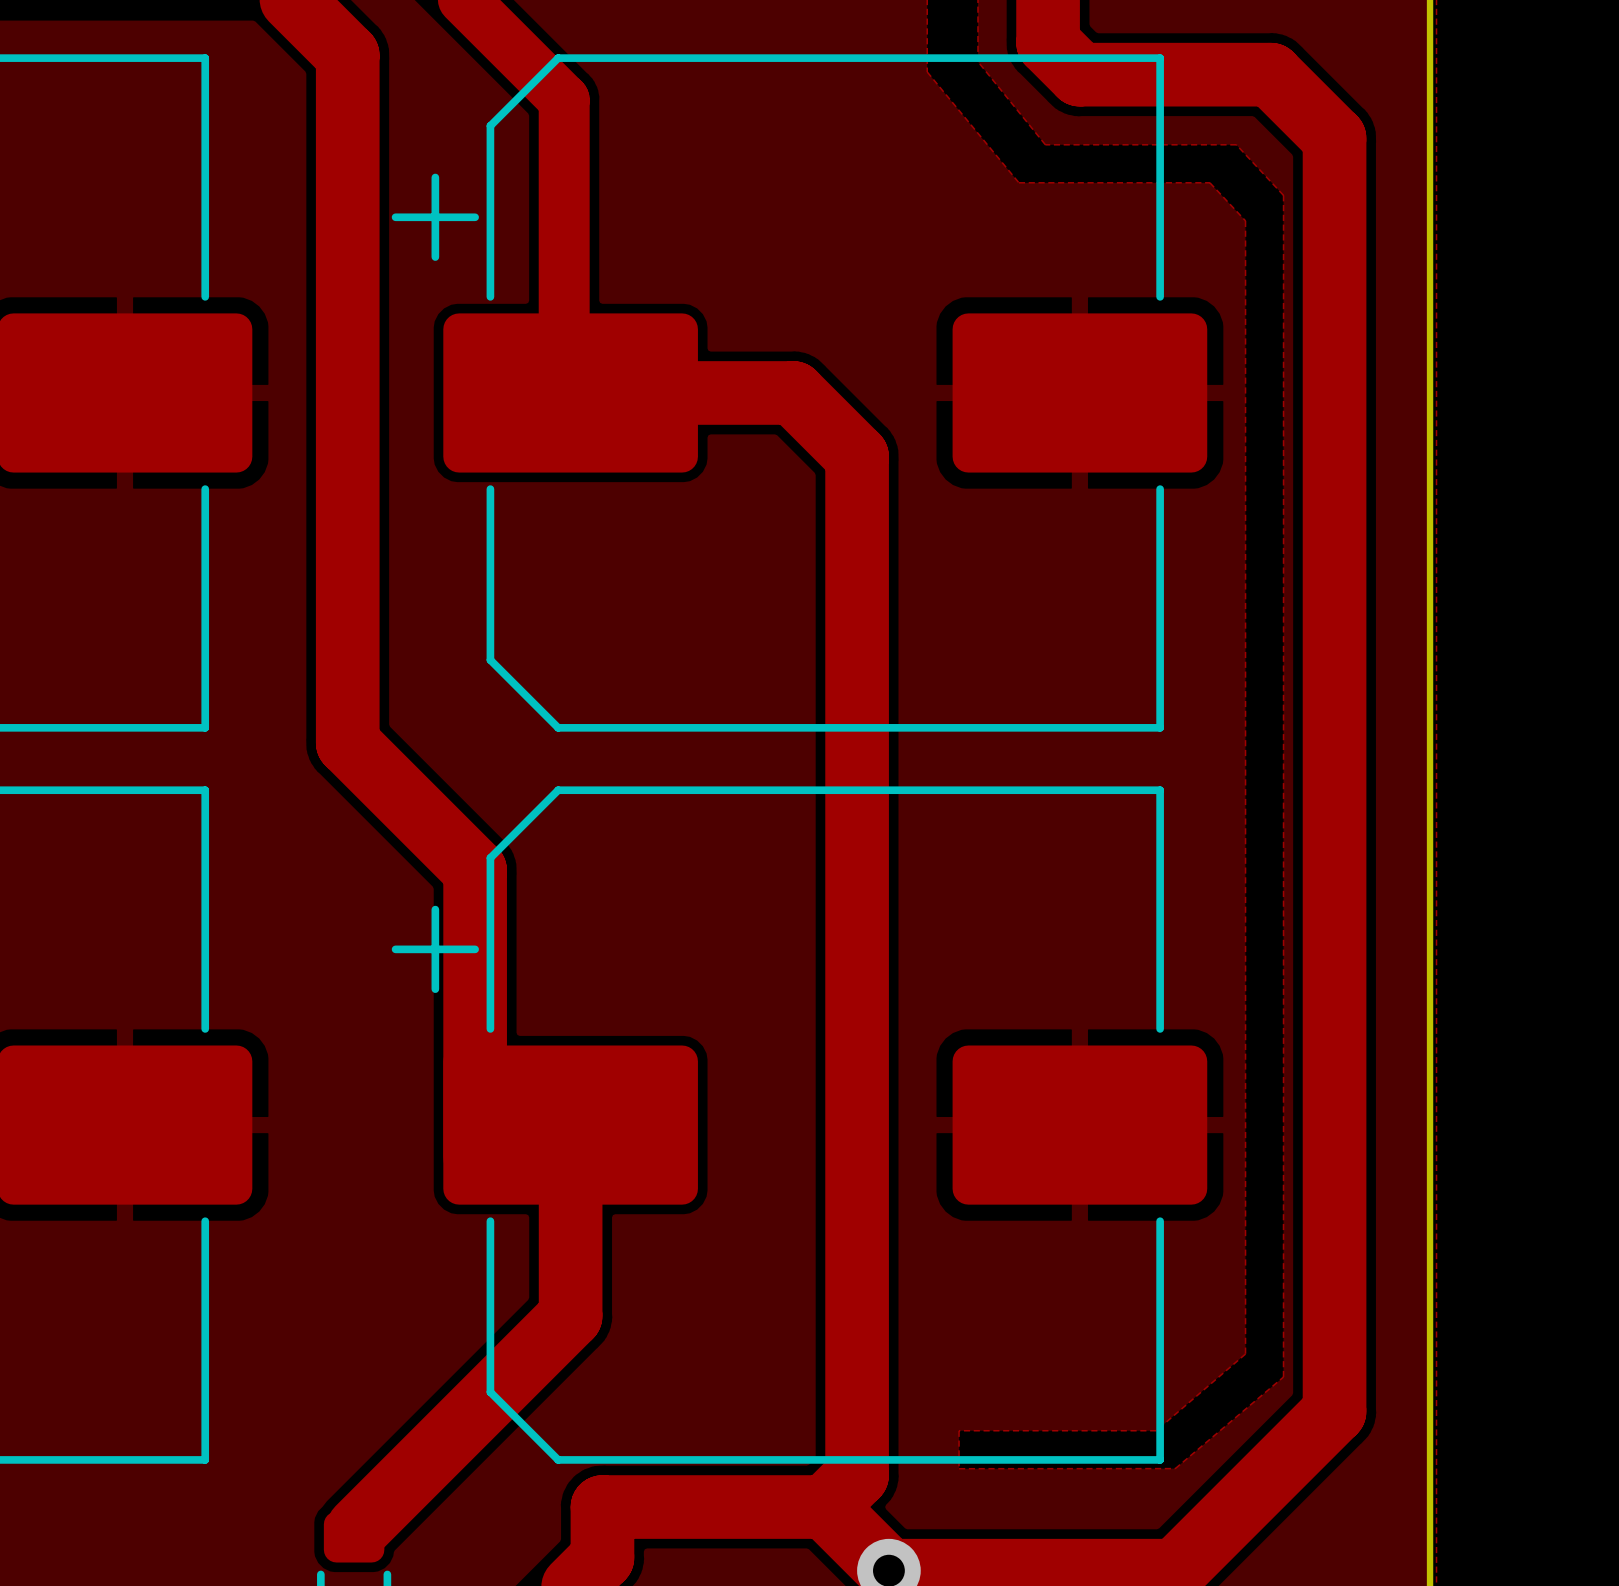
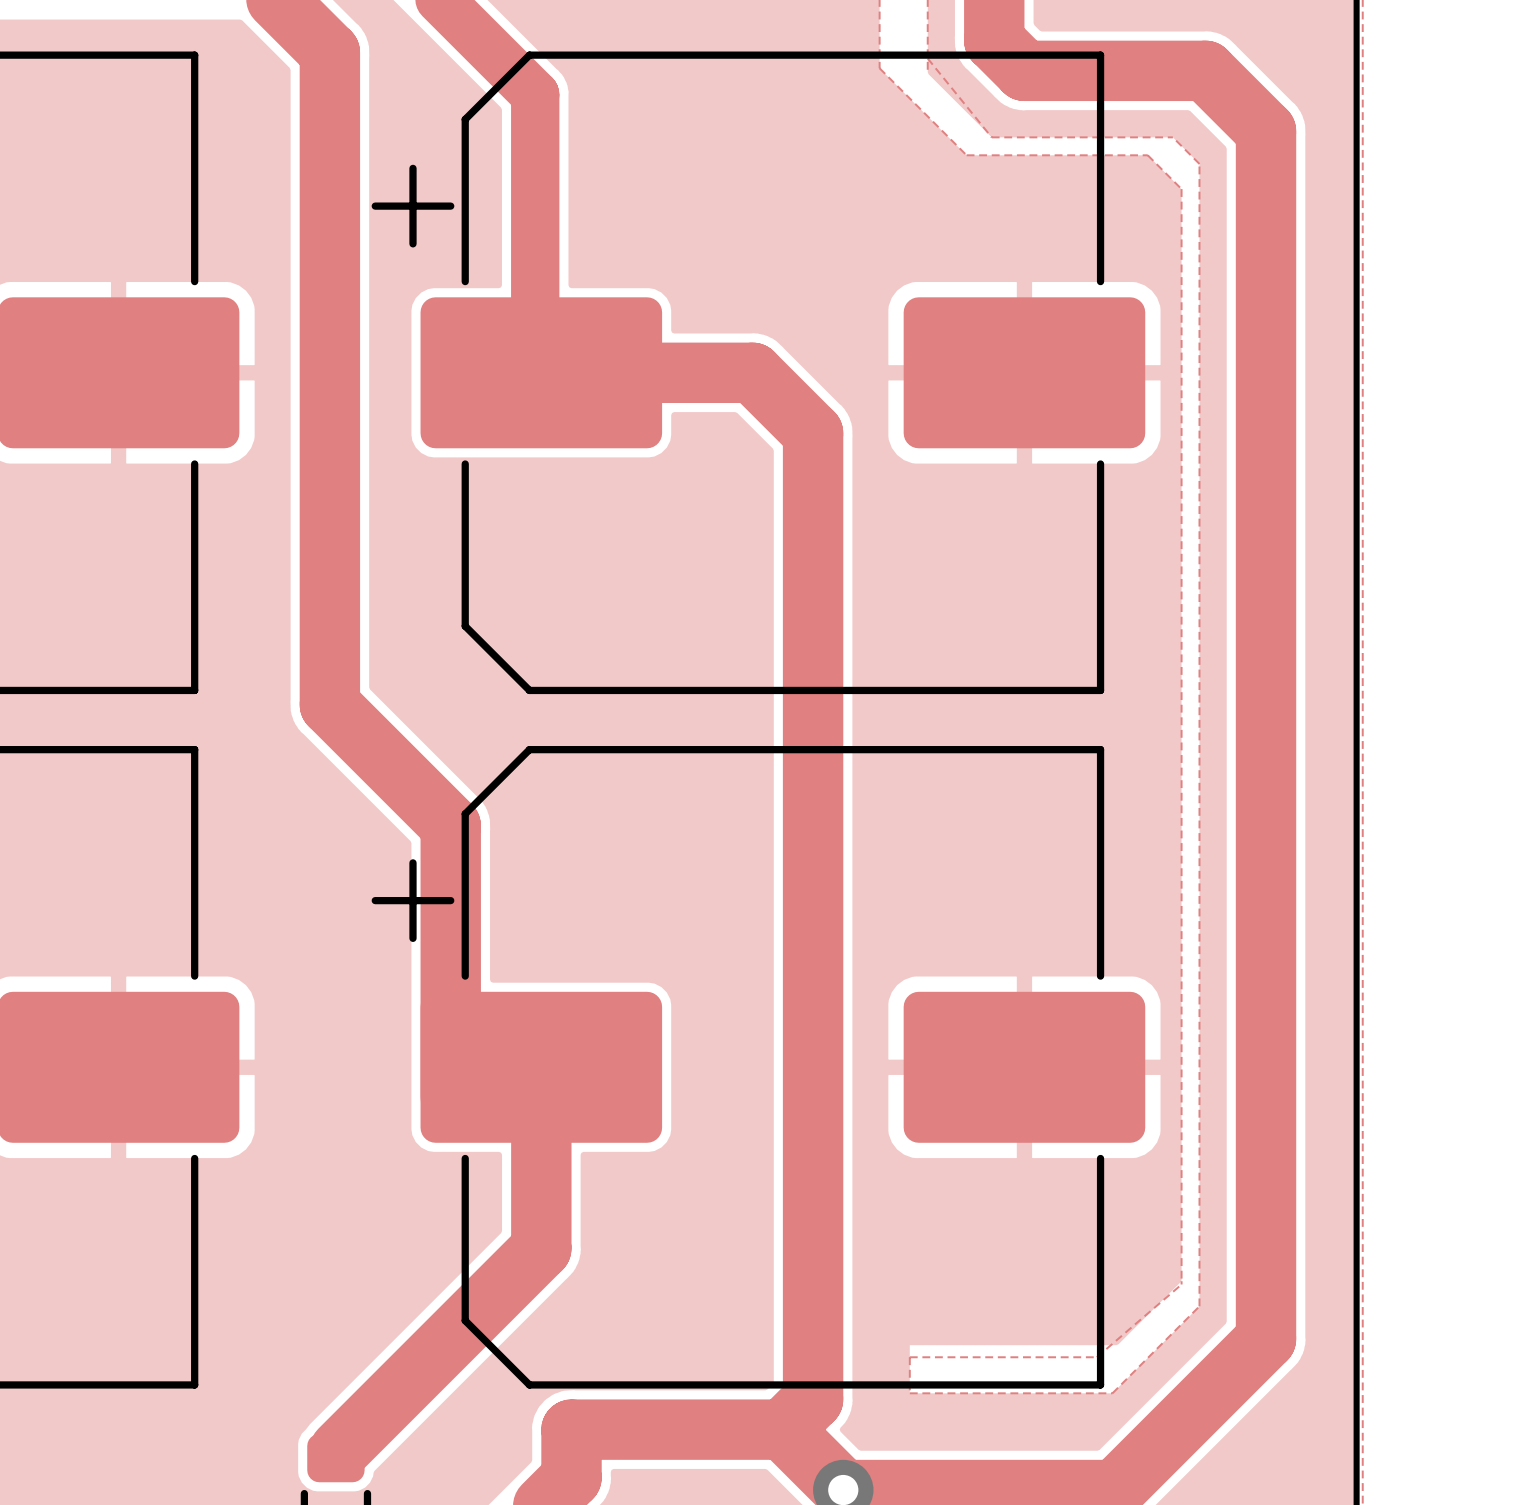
zone outline: (927, 71) (1018, 182) (1209, 182) (1245, 220) -> (879, 68) (966, 155) (1147, 155) (1181, 189) (1181, 209)
zone outline: (1236, 144) (1283, 195) (1283, 1377) (1175, 1468) (959, 1468) -> (1172, 137) (1199, 163) (1199, 1306) (1112, 1393) (909, 1393)

